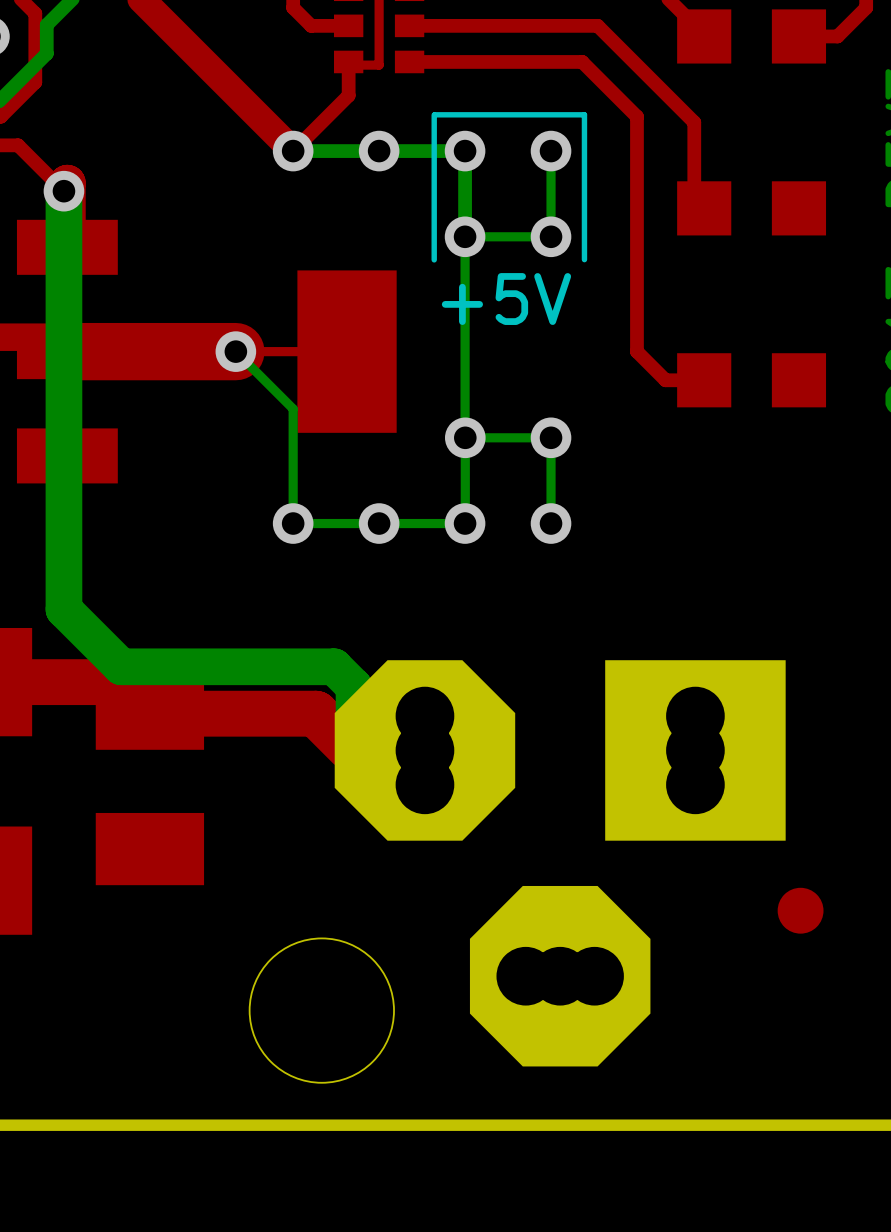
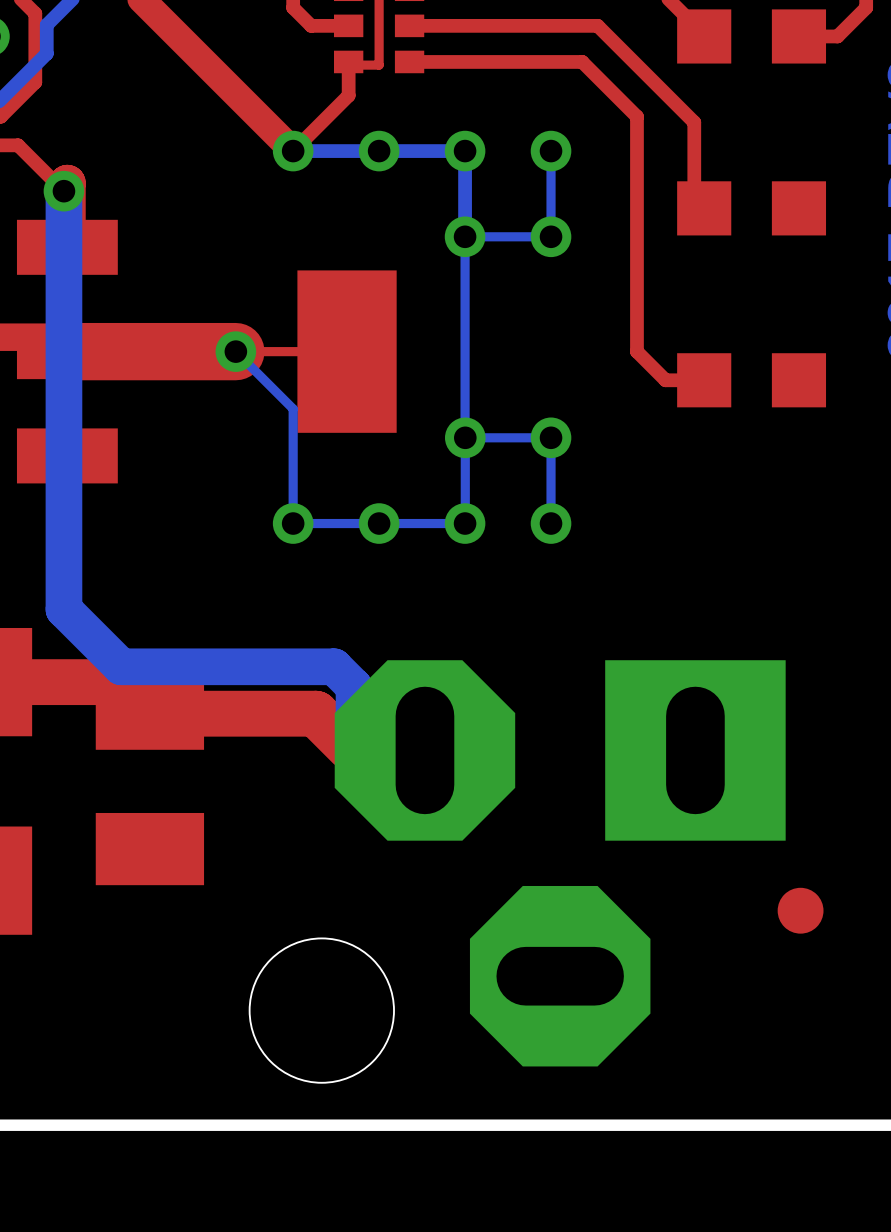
line: (434, 114) (584, 114) (584, 259) -> none
line: (434, 115) (434, 259) -> none
text: +5V (506, 299) -> none
part footprint: [334, 660, 786, 1067] -> [334, 660, 786, 1067]

